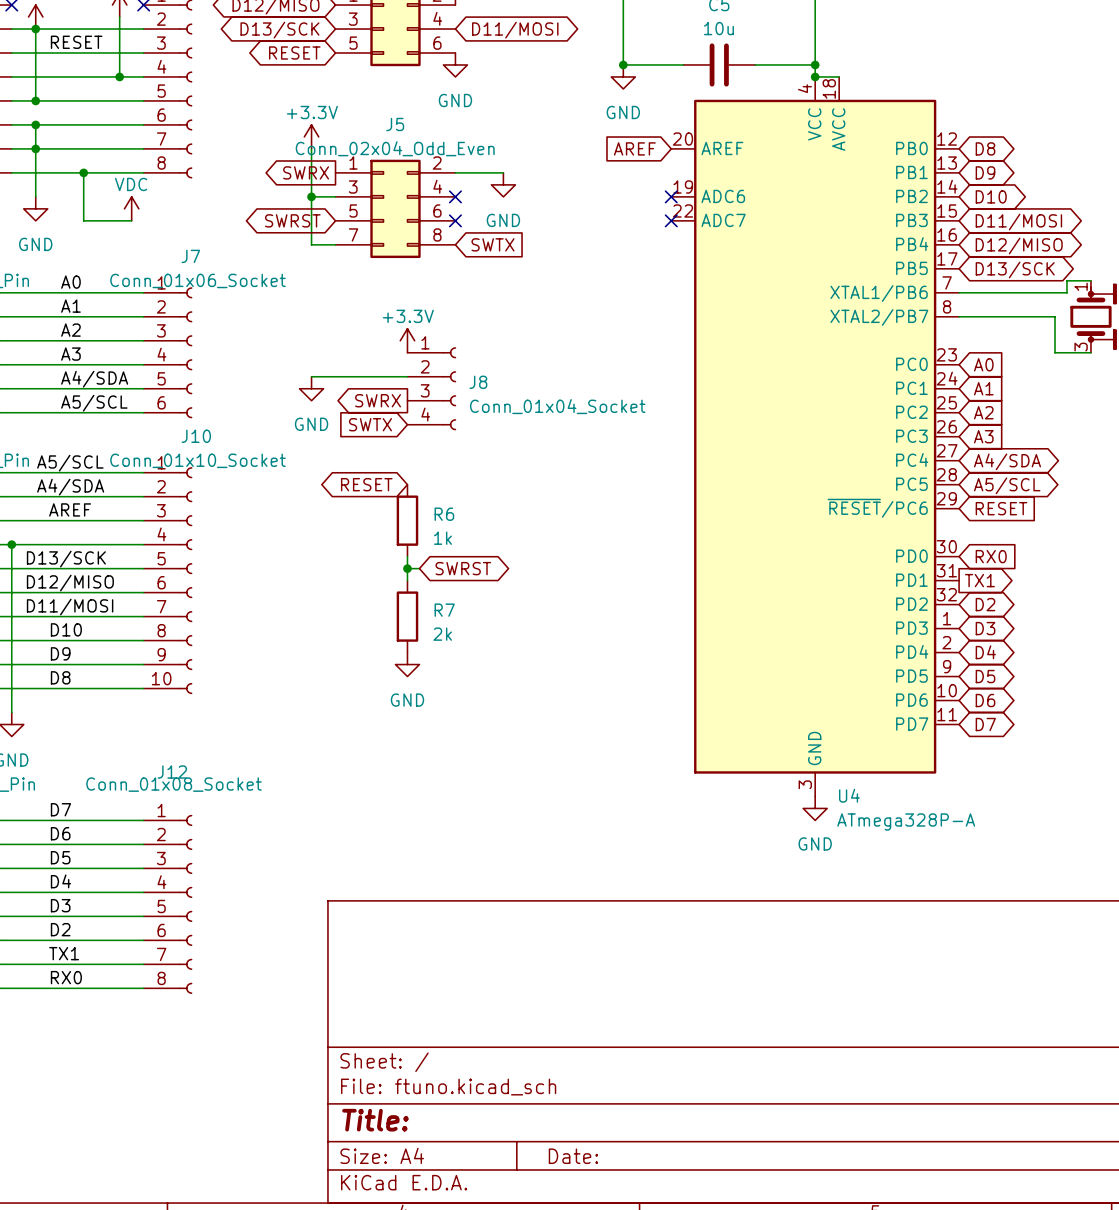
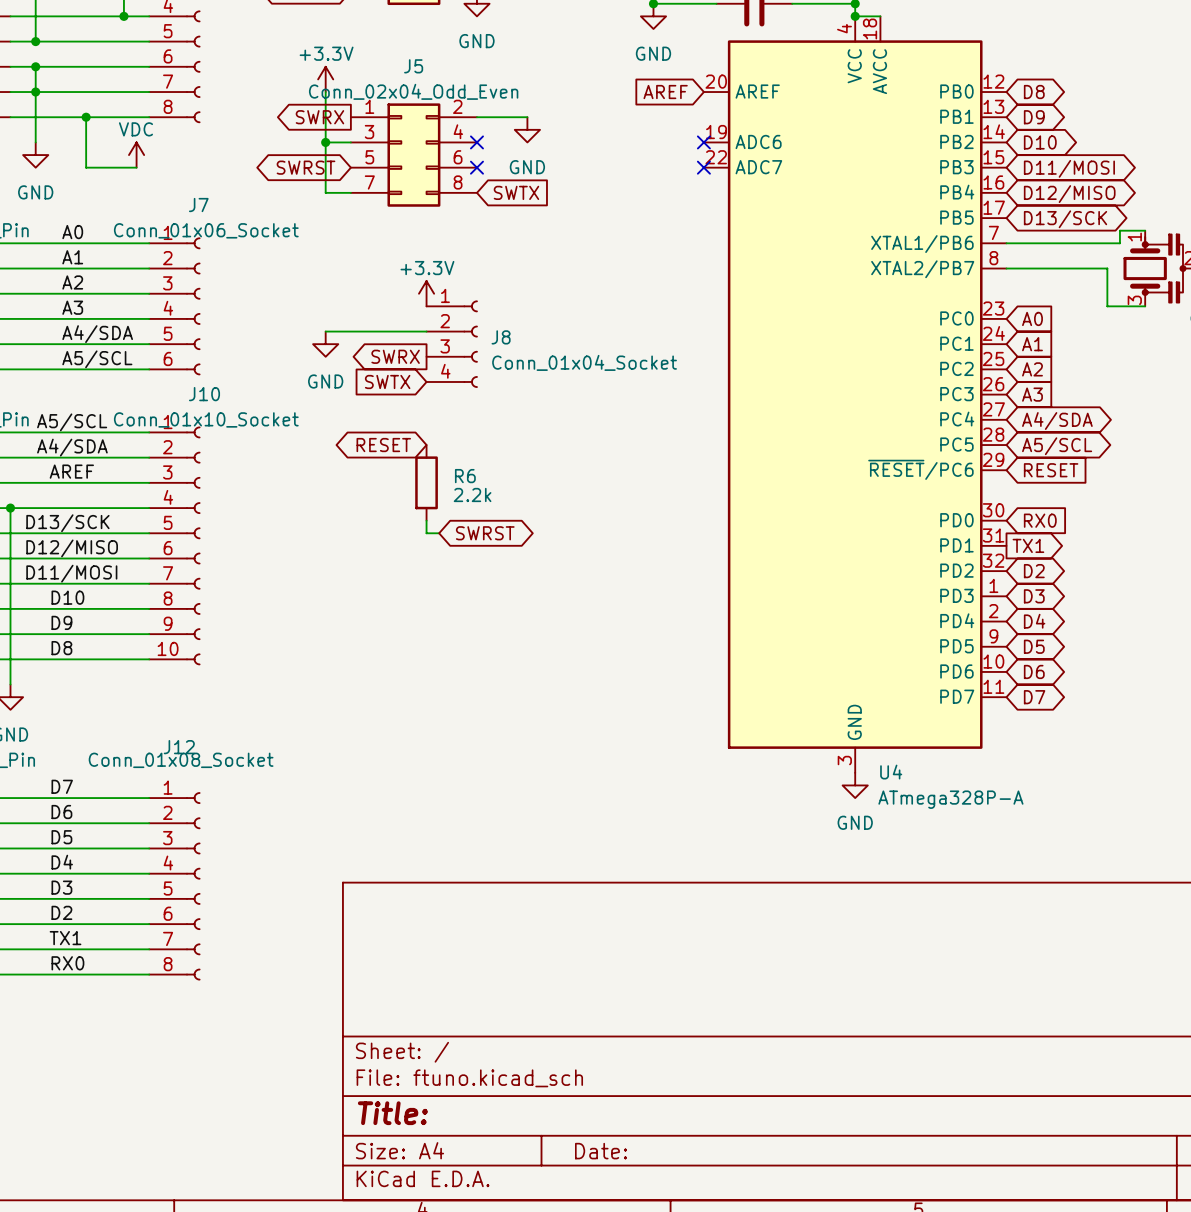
R6 value: 1k (442, 538) -> 2.2k (472, 494)
wire: (407, 568) (407, 580) -> none
junction: (407, 568) -> none
R7: 2k (407, 616) -> none
power symbol: GND (407, 664) -> none

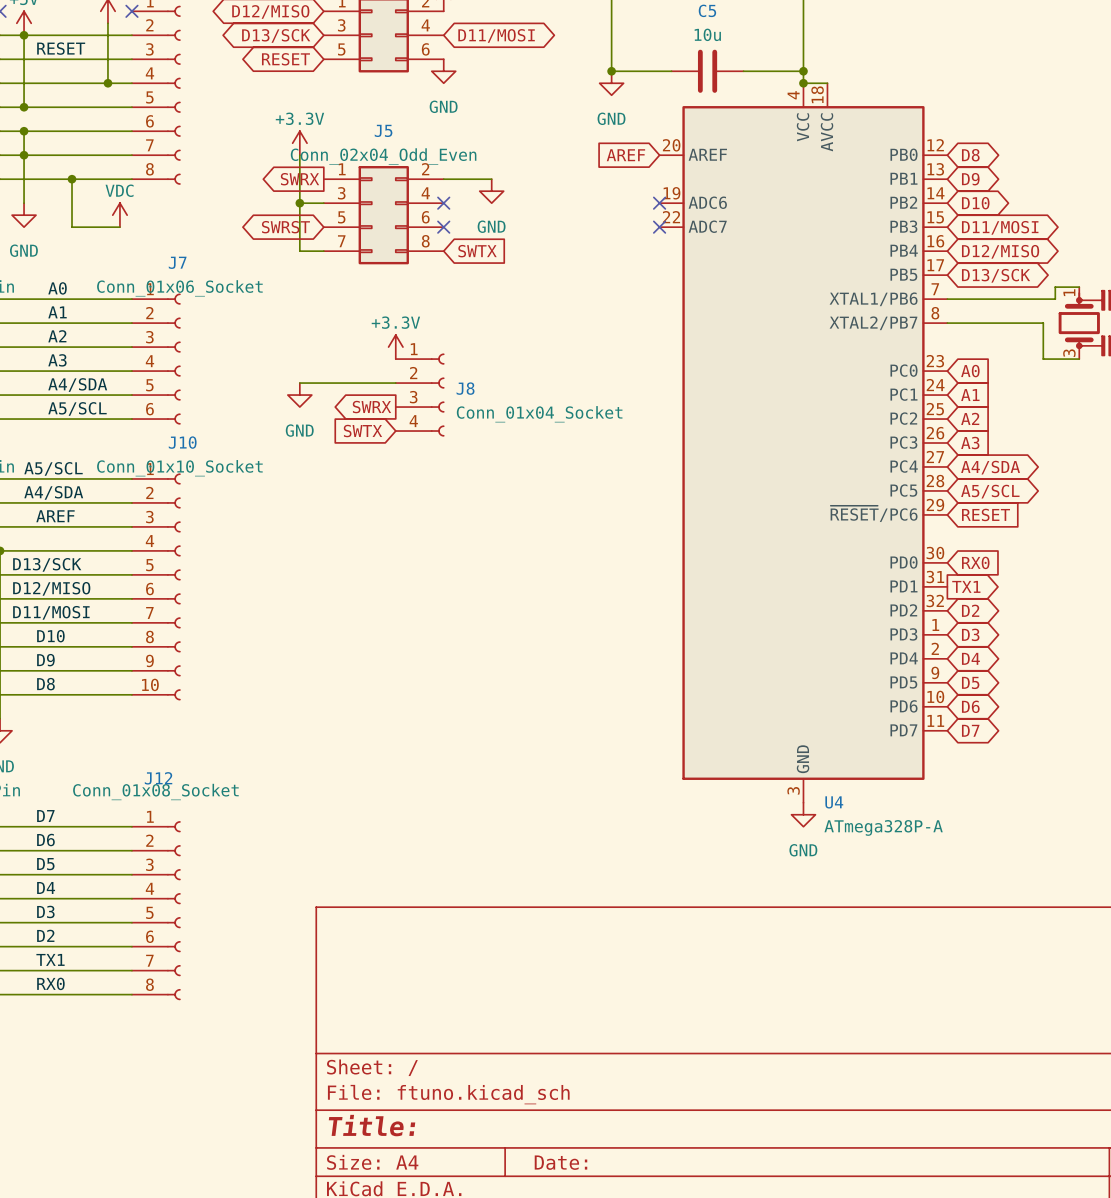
global label: RESET (383, 445) -> none
R6: 2.2k (426, 482) -> none
wire: (426, 520) (426, 533) (439, 533) -> none
global label: SWRST (485, 533) -> none

